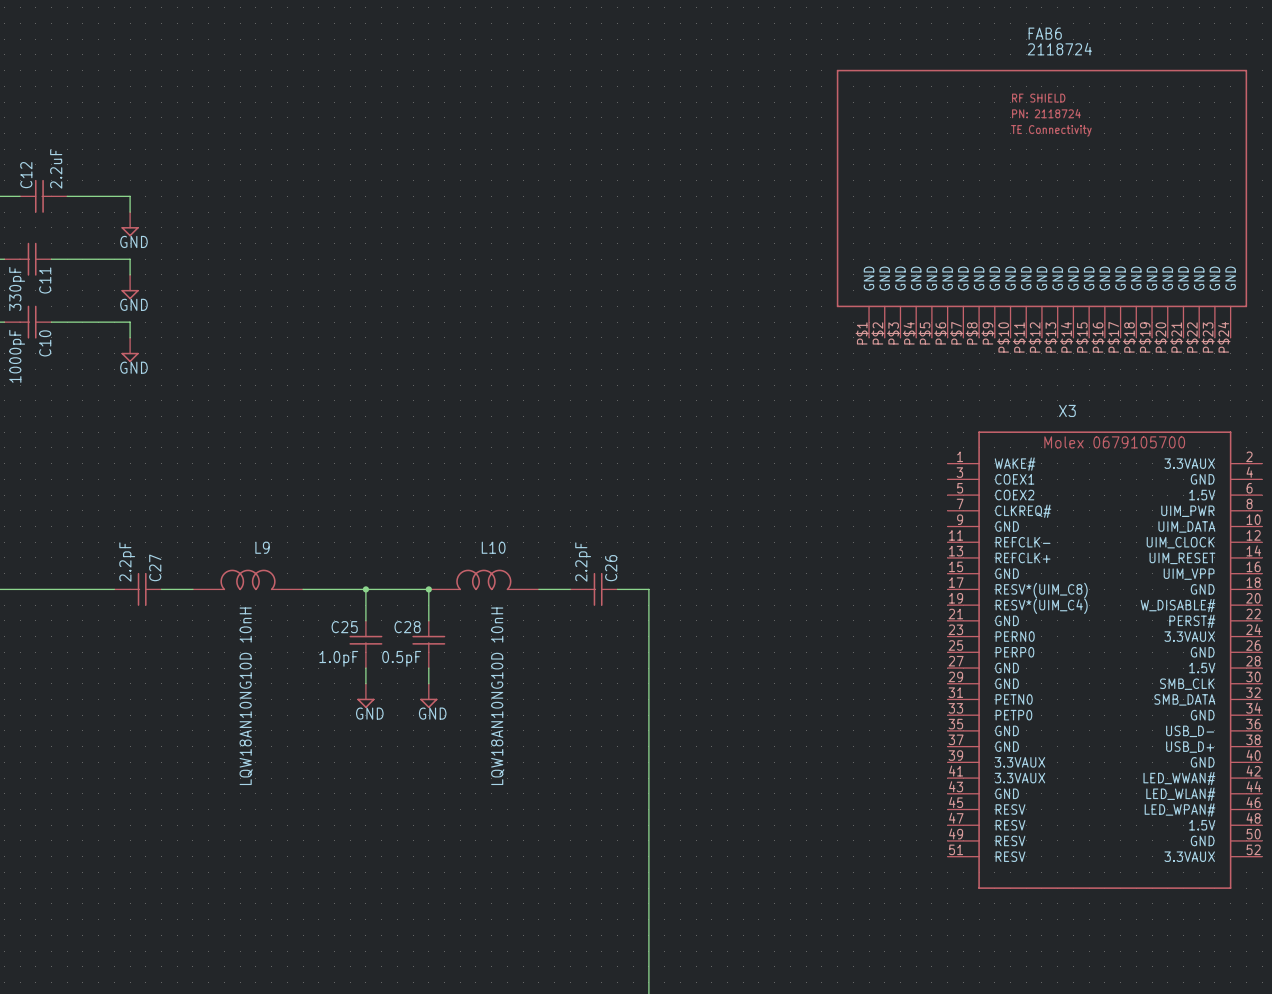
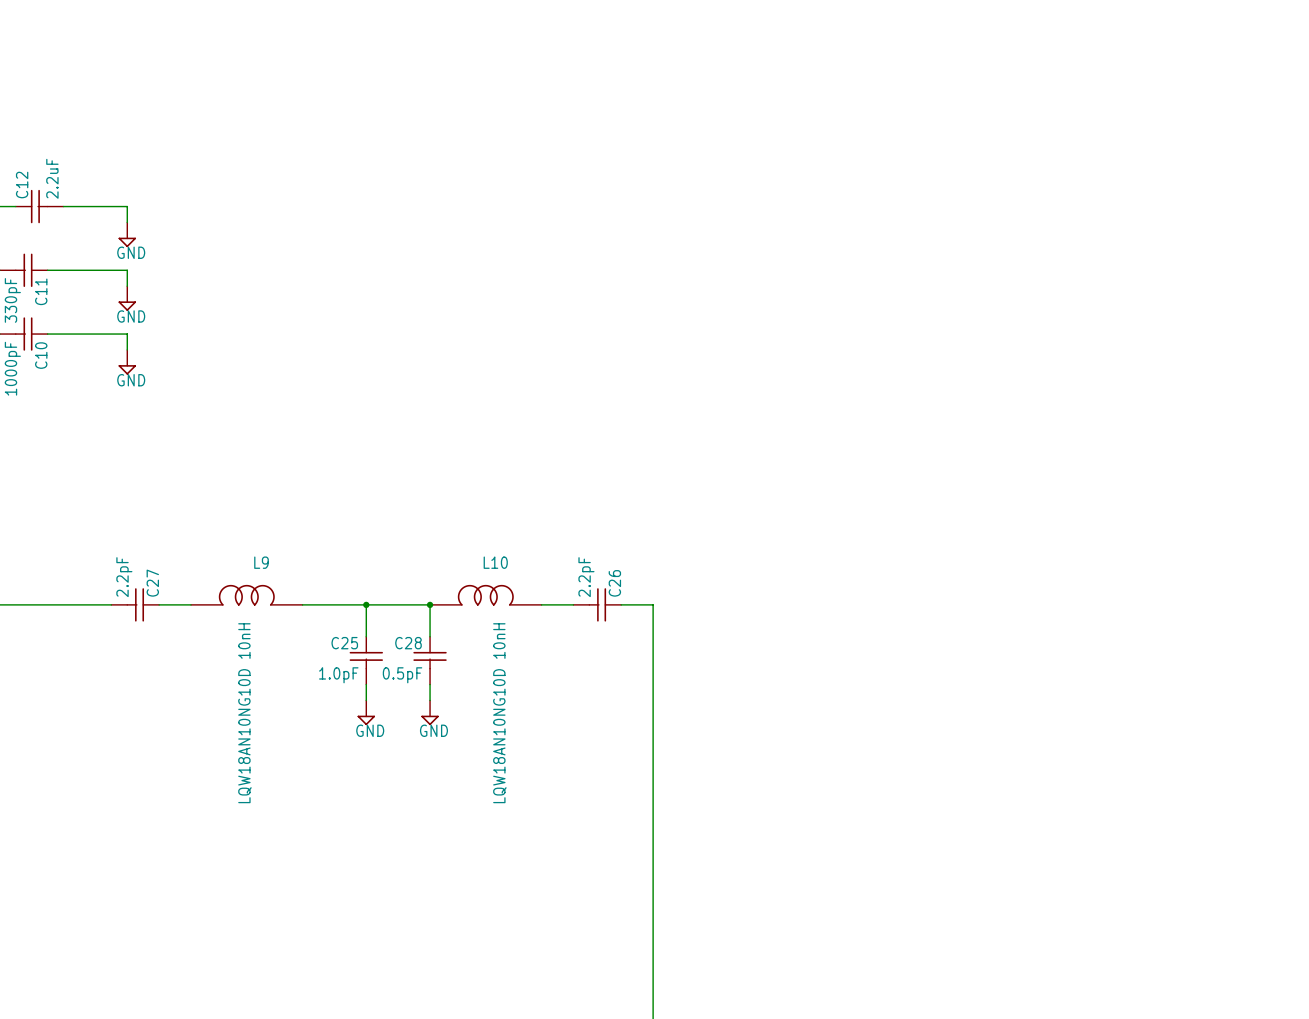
FAB6: 2118724 (1041, 203) -> none
X3: (1104, 660) -> none

